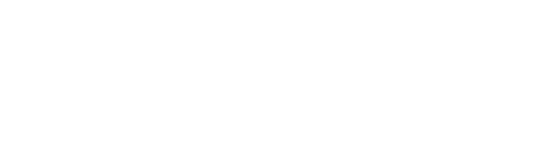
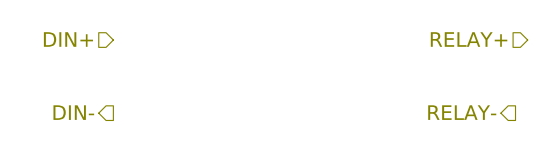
hierarchical label: none -> DIN+ (68, 39)
hierarchical label: none -> RELAY+ (469, 39)
hierarchical label: none -> DIN- (73, 112)
hierarchical label: none -> RELAY- (462, 112)

